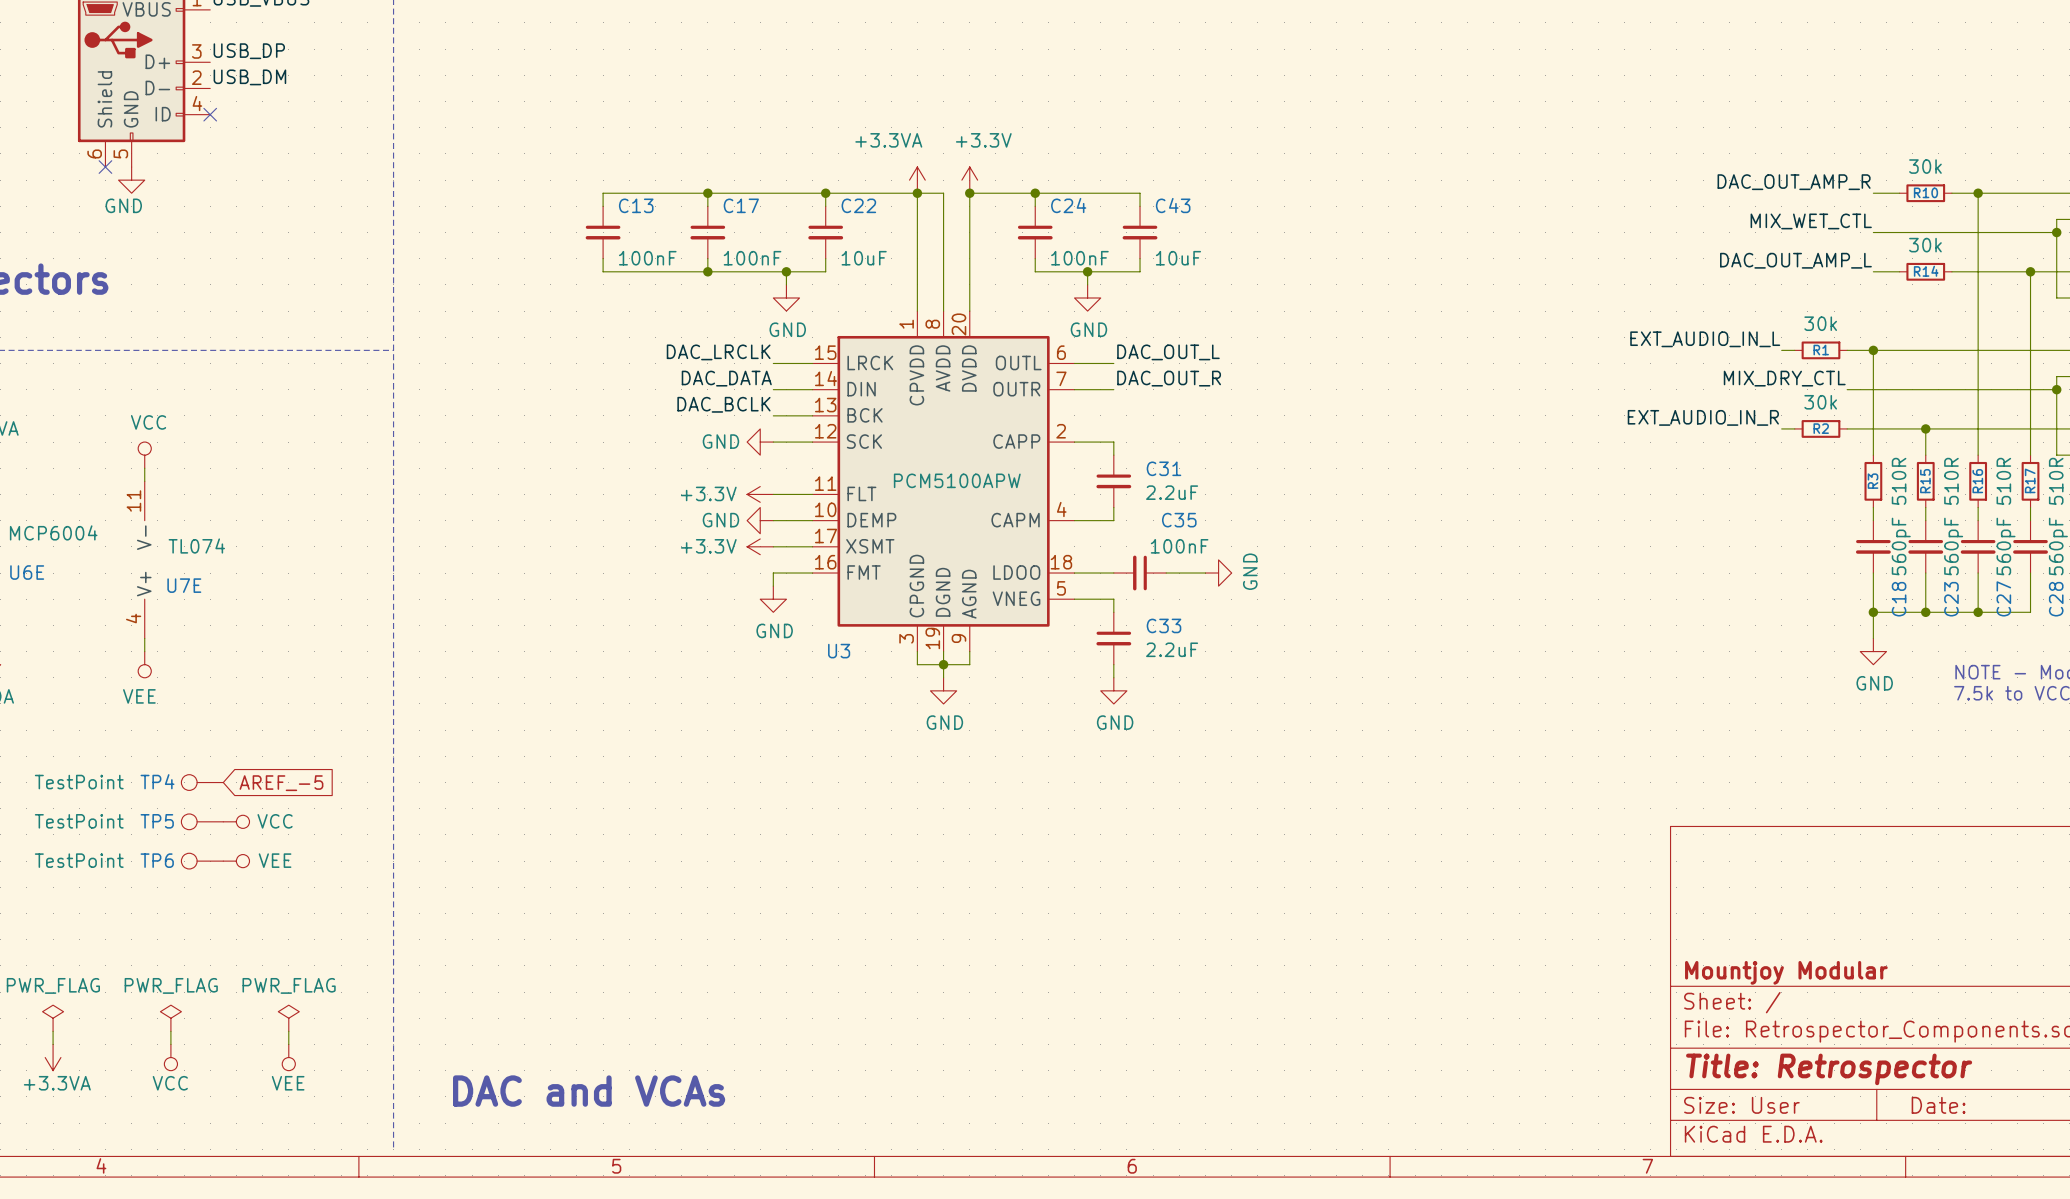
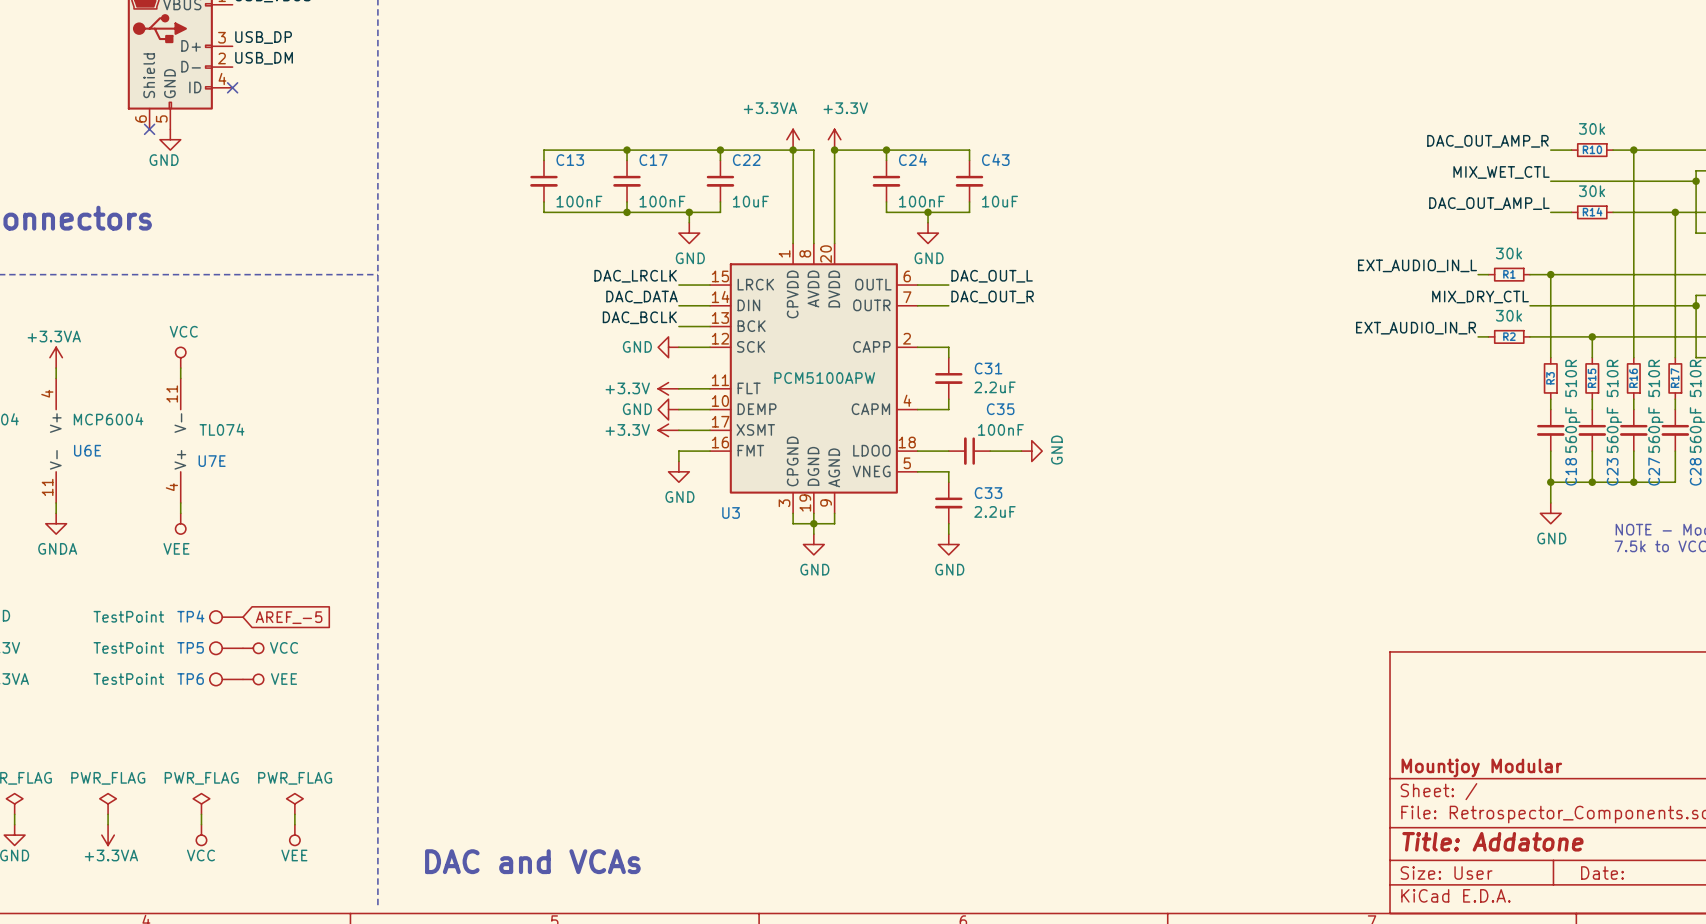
title block: Title: Retrospector (1829, 1069) -> Title: Addatone (1492, 841)

